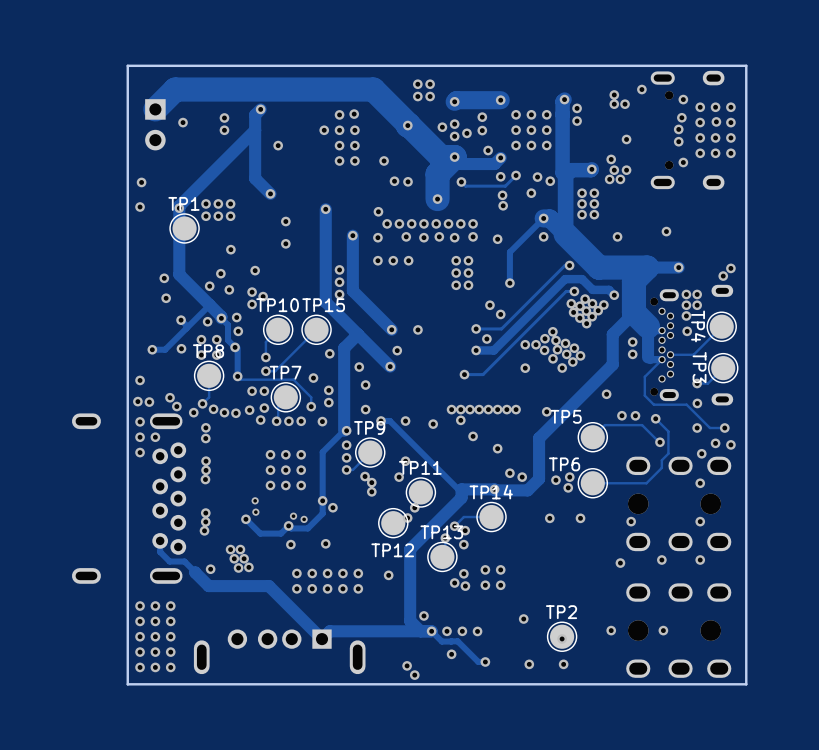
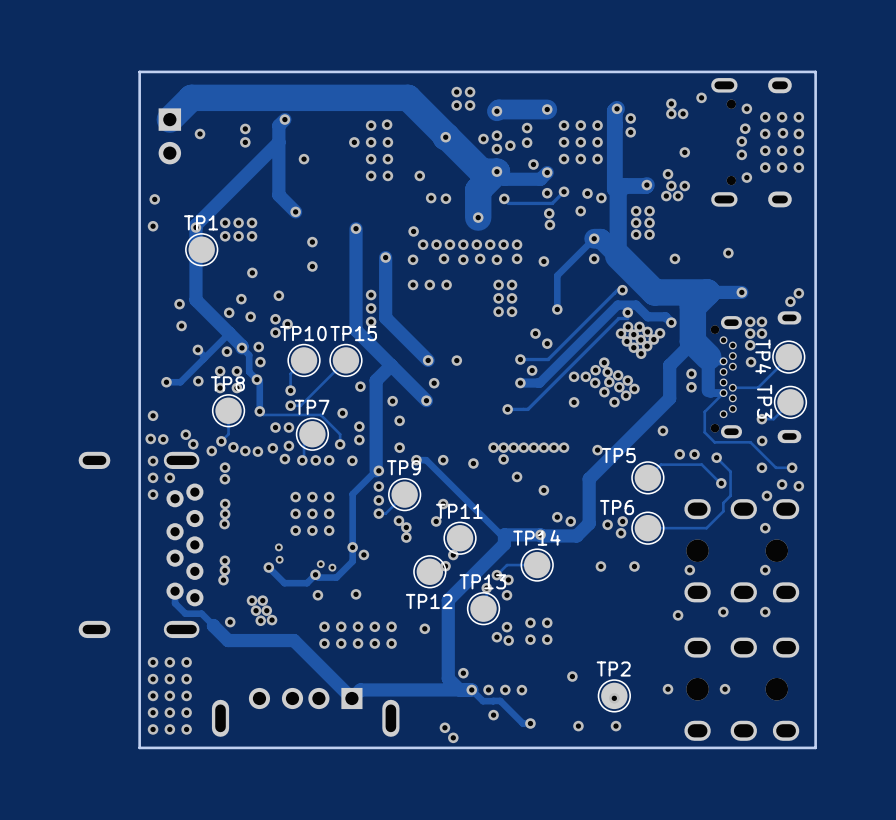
via: none -> (627, 312)
via: (574, 291) -> none
via: none -> (628, 326)
via: (571, 303) -> none
via: none -> (621, 333)

